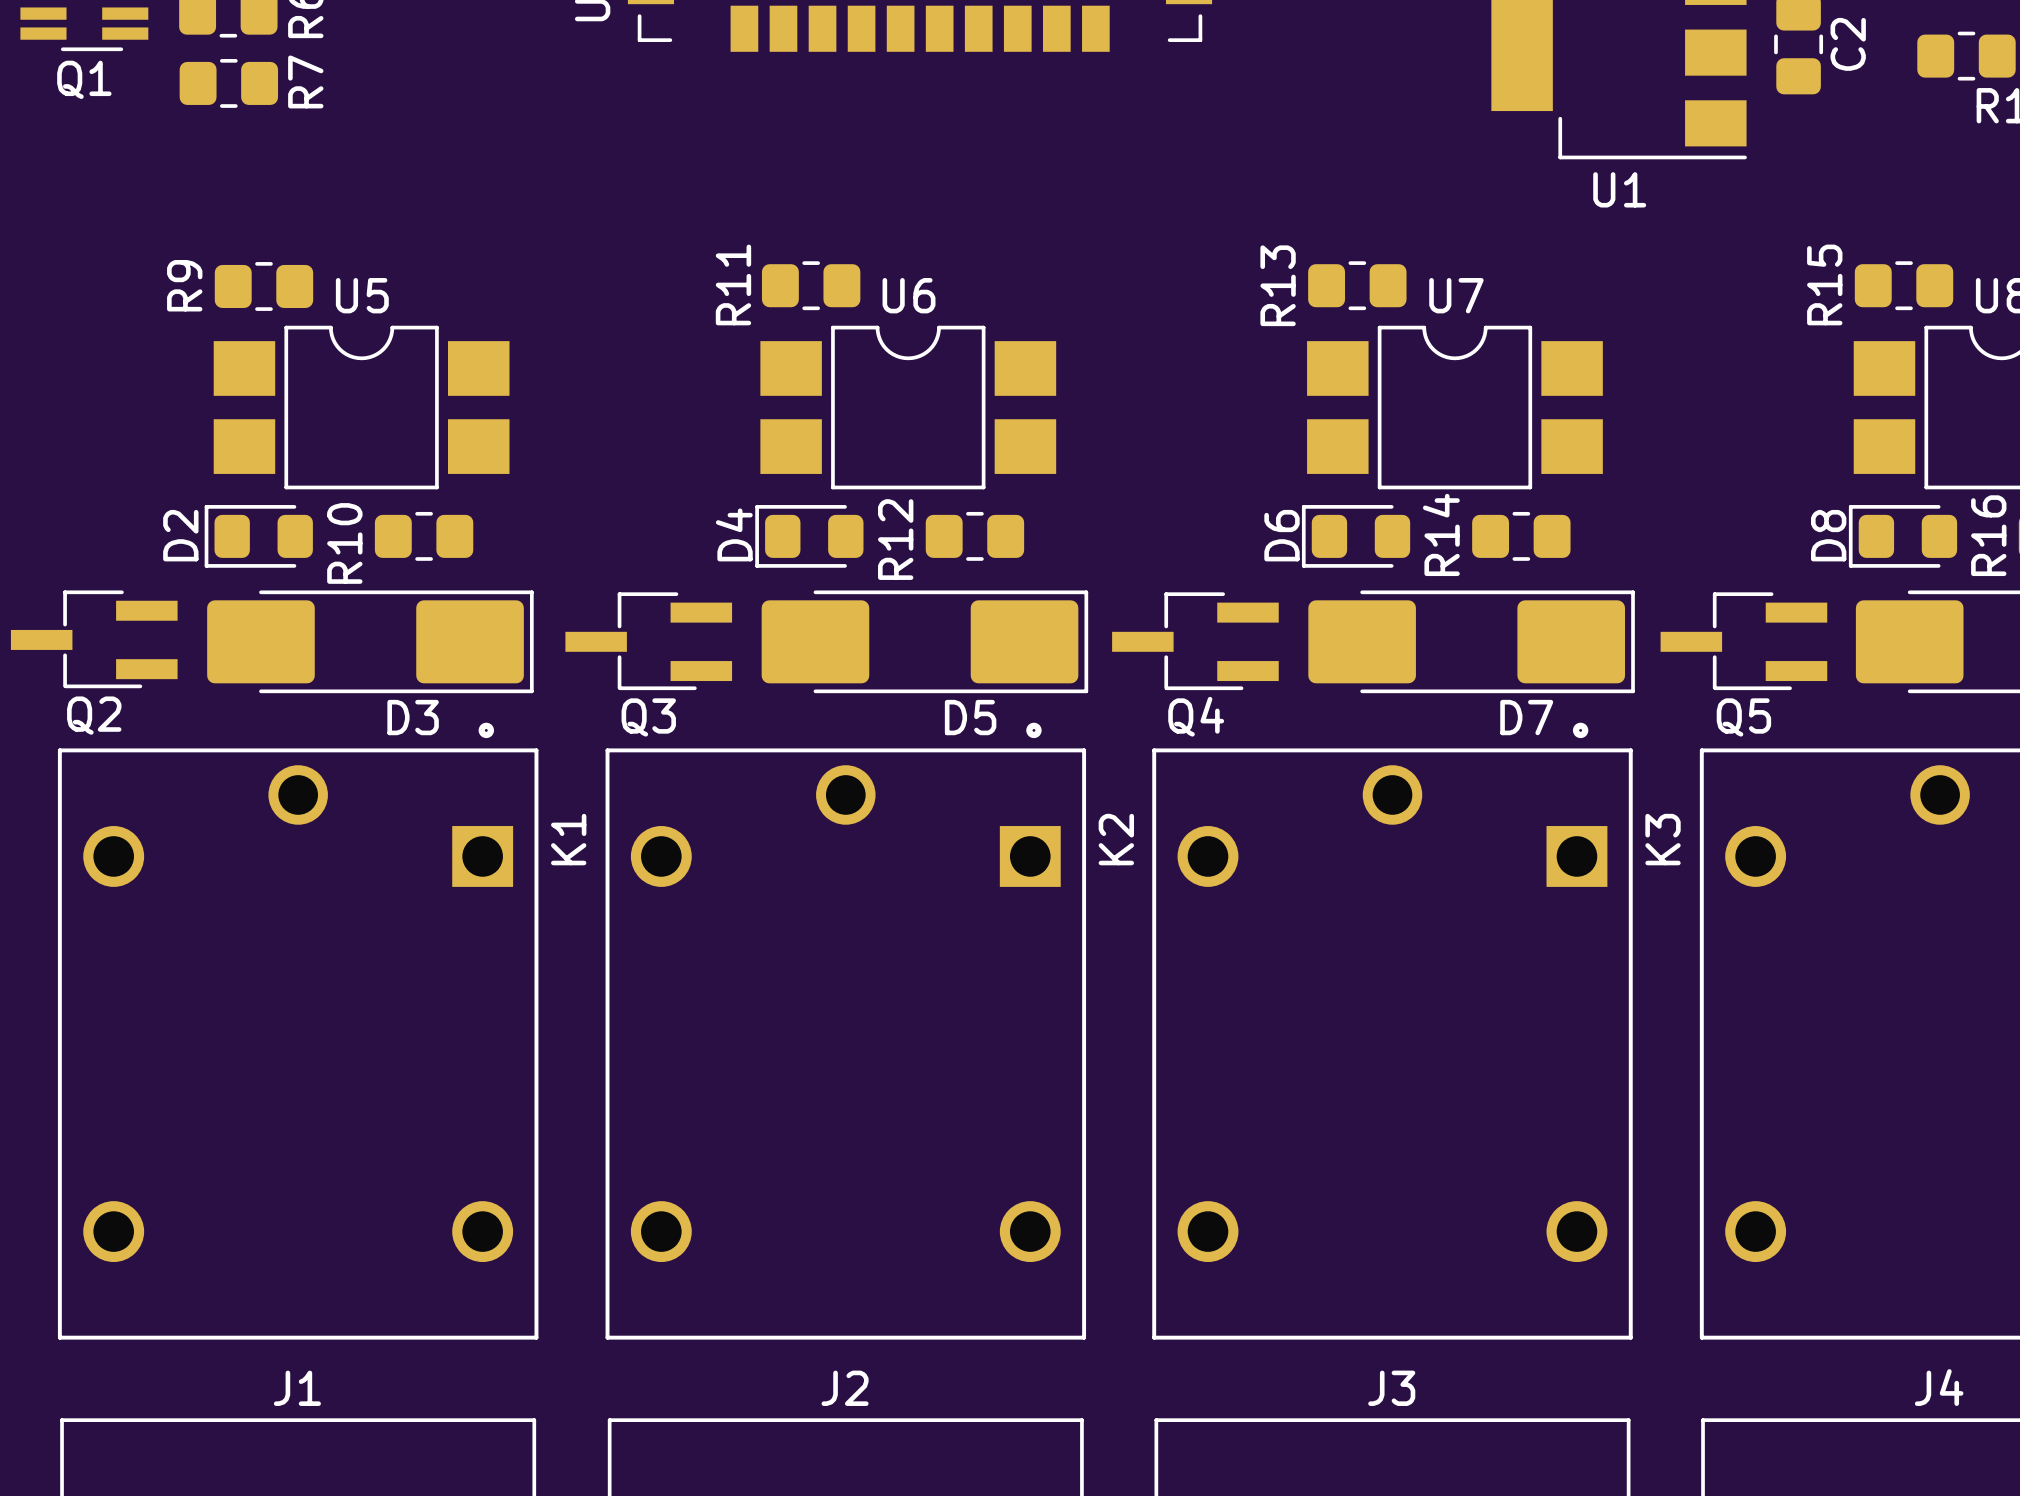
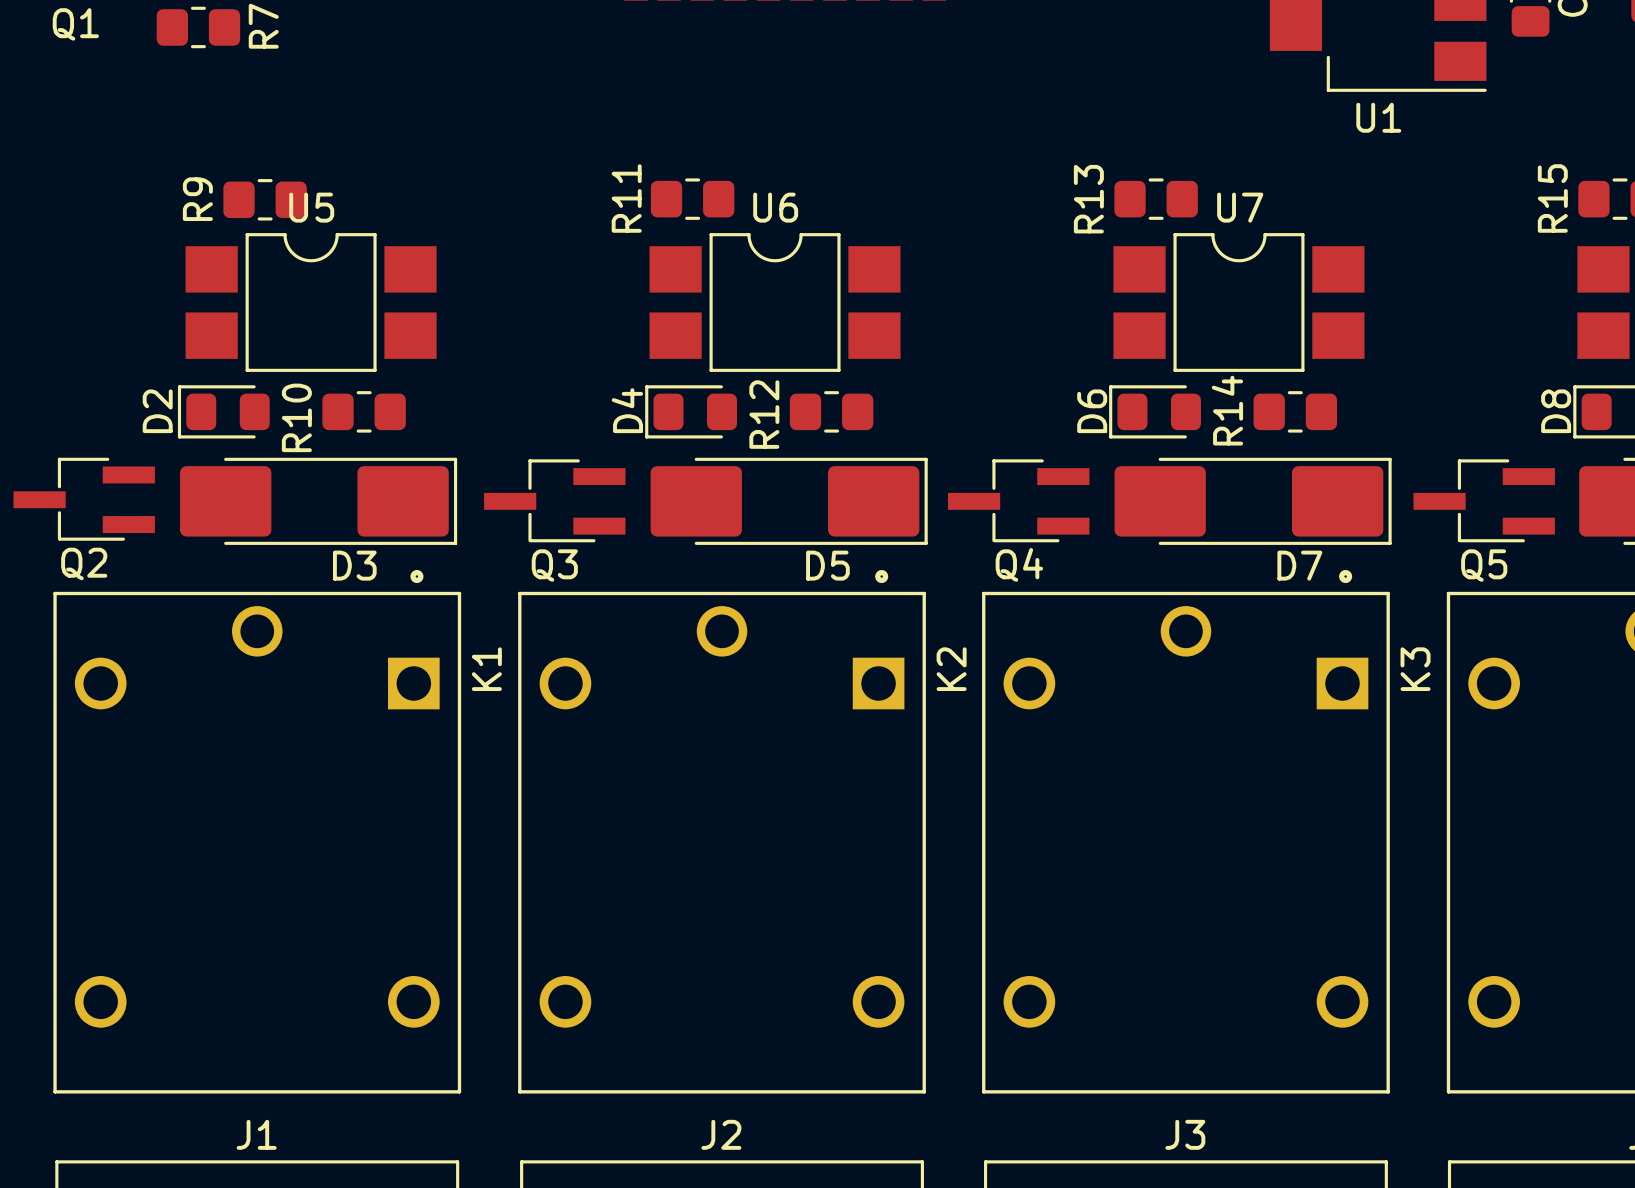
R9 position: (263, 286) -> (265, 199)

